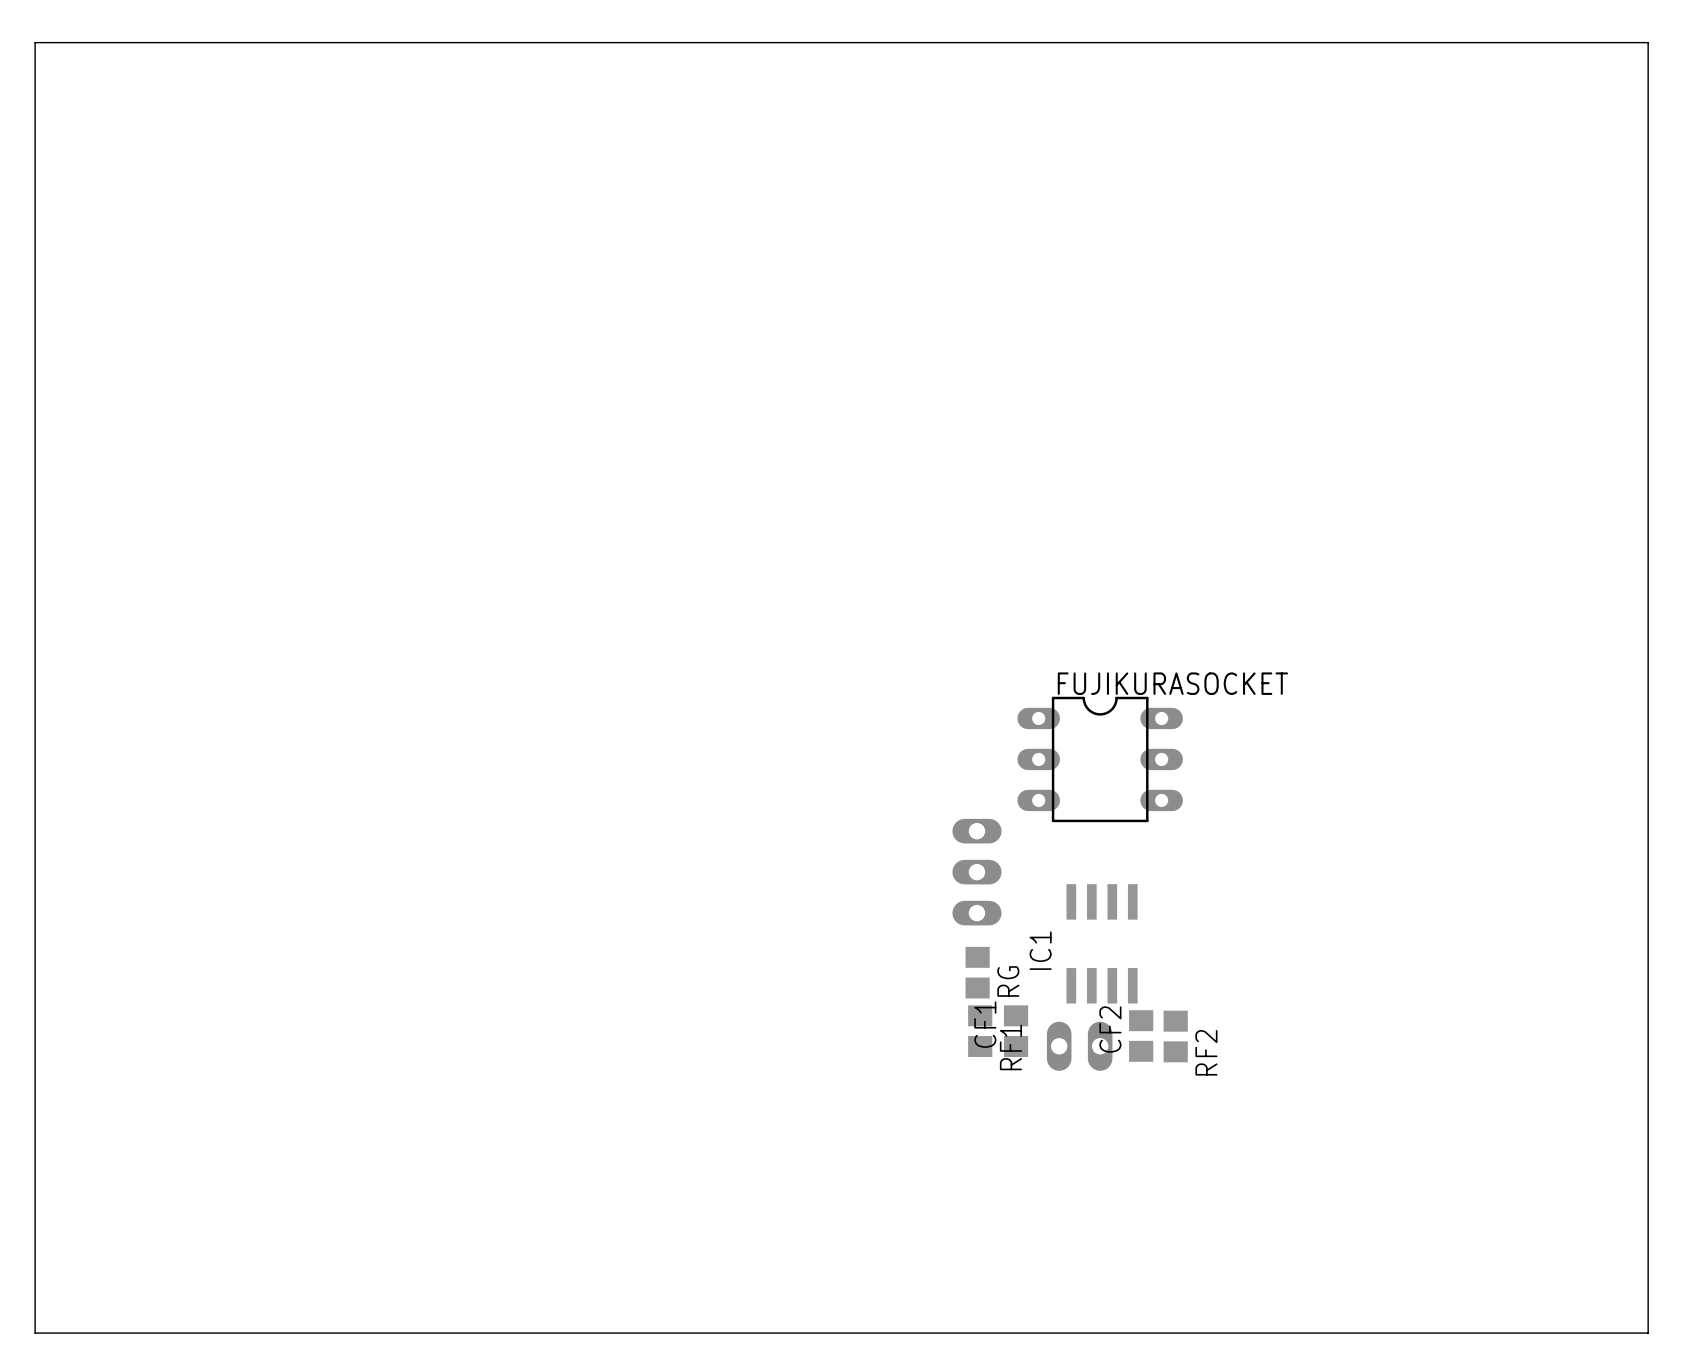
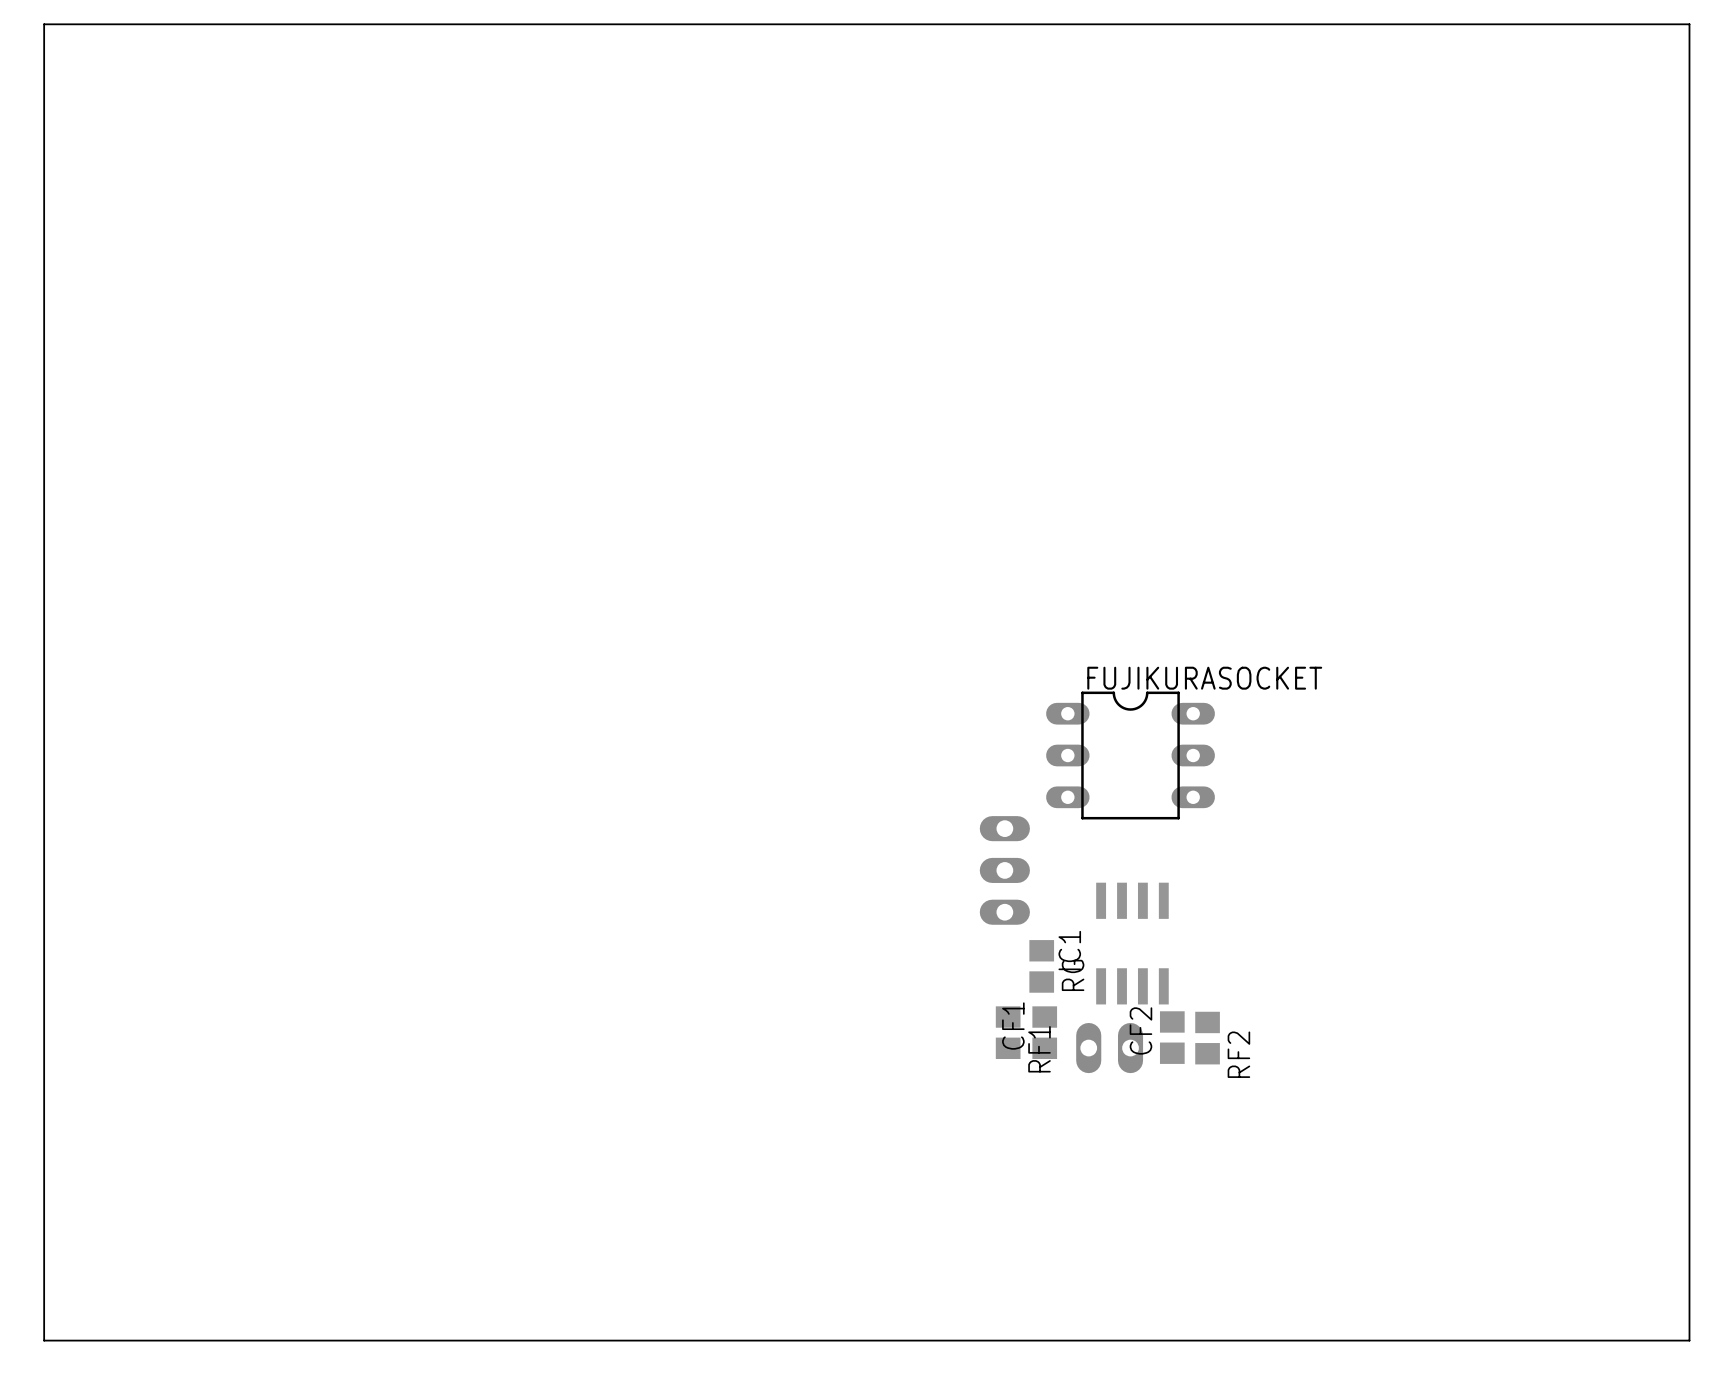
RG position: (977, 972) -> (1041, 966)

